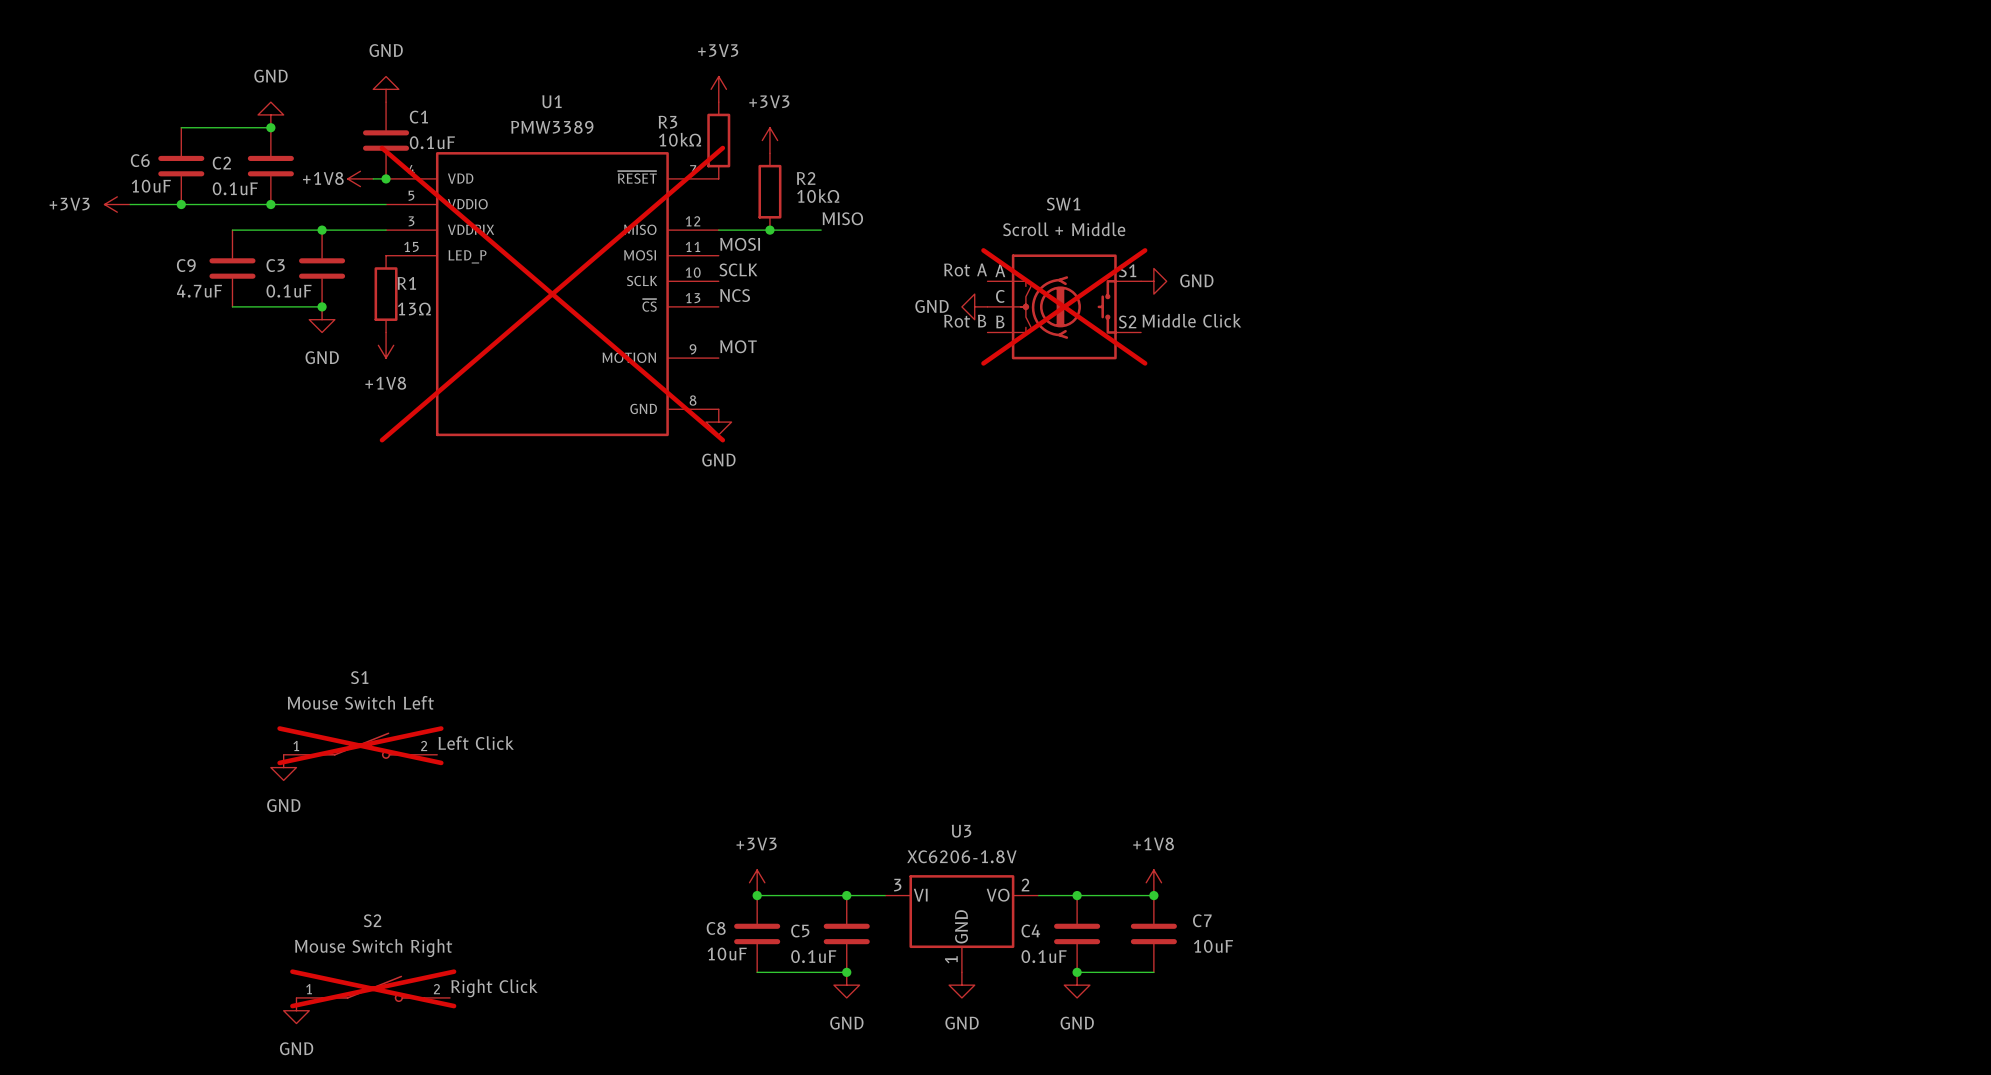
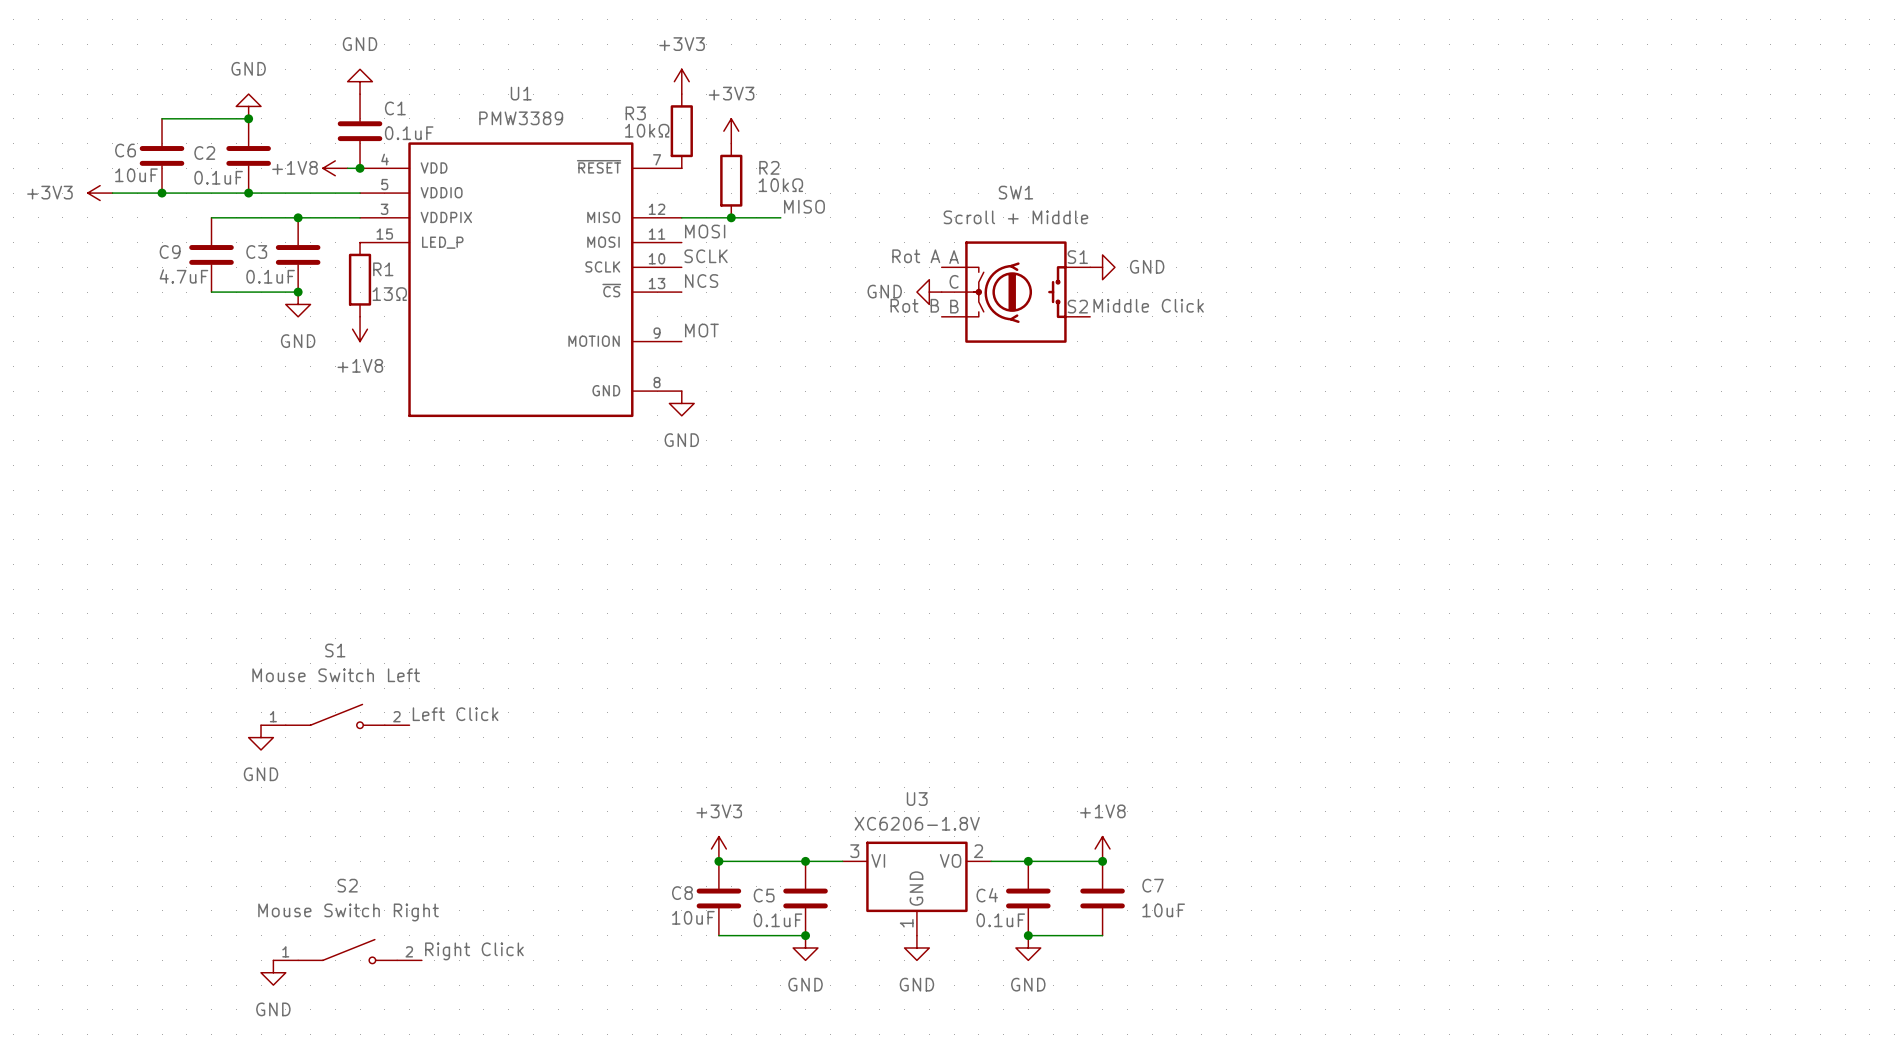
U1 do-not-place cross: (552, 294) -> none
SW1 do-not-place cross: (1064, 306) -> none
S1 do-not-place cross: (360, 745) -> none
S2 do-not-place cross: (373, 988) -> none

